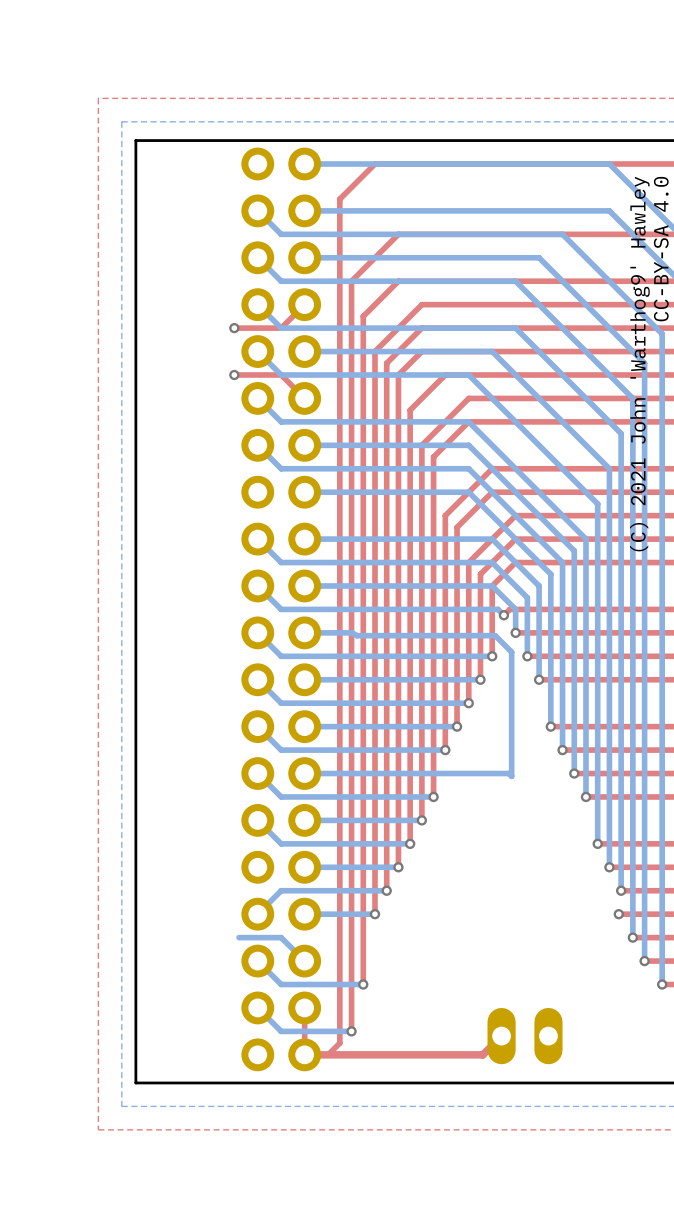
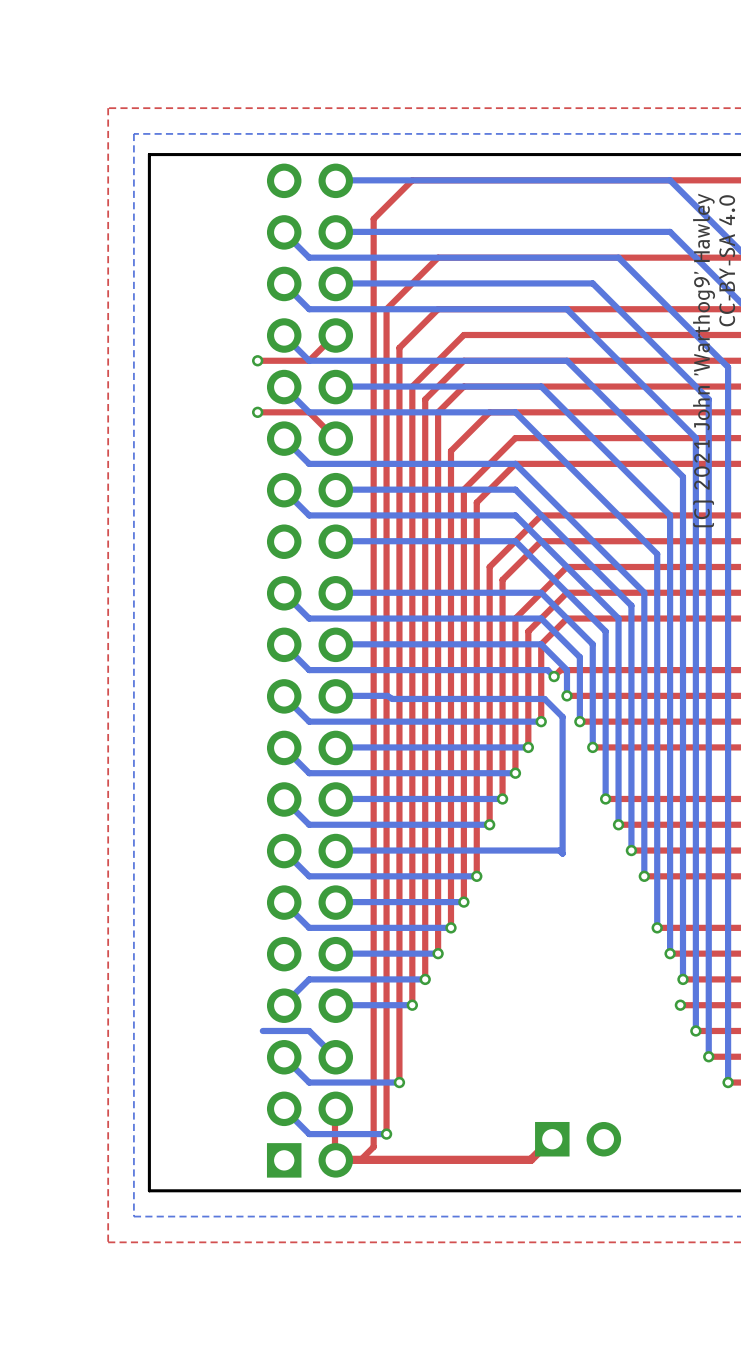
part footprint: [241, 147, 322, 1072] -> [266, 163, 354, 1178]
part footprint: [487, 1007, 563, 1065] -> [535, 1121, 622, 1157]

